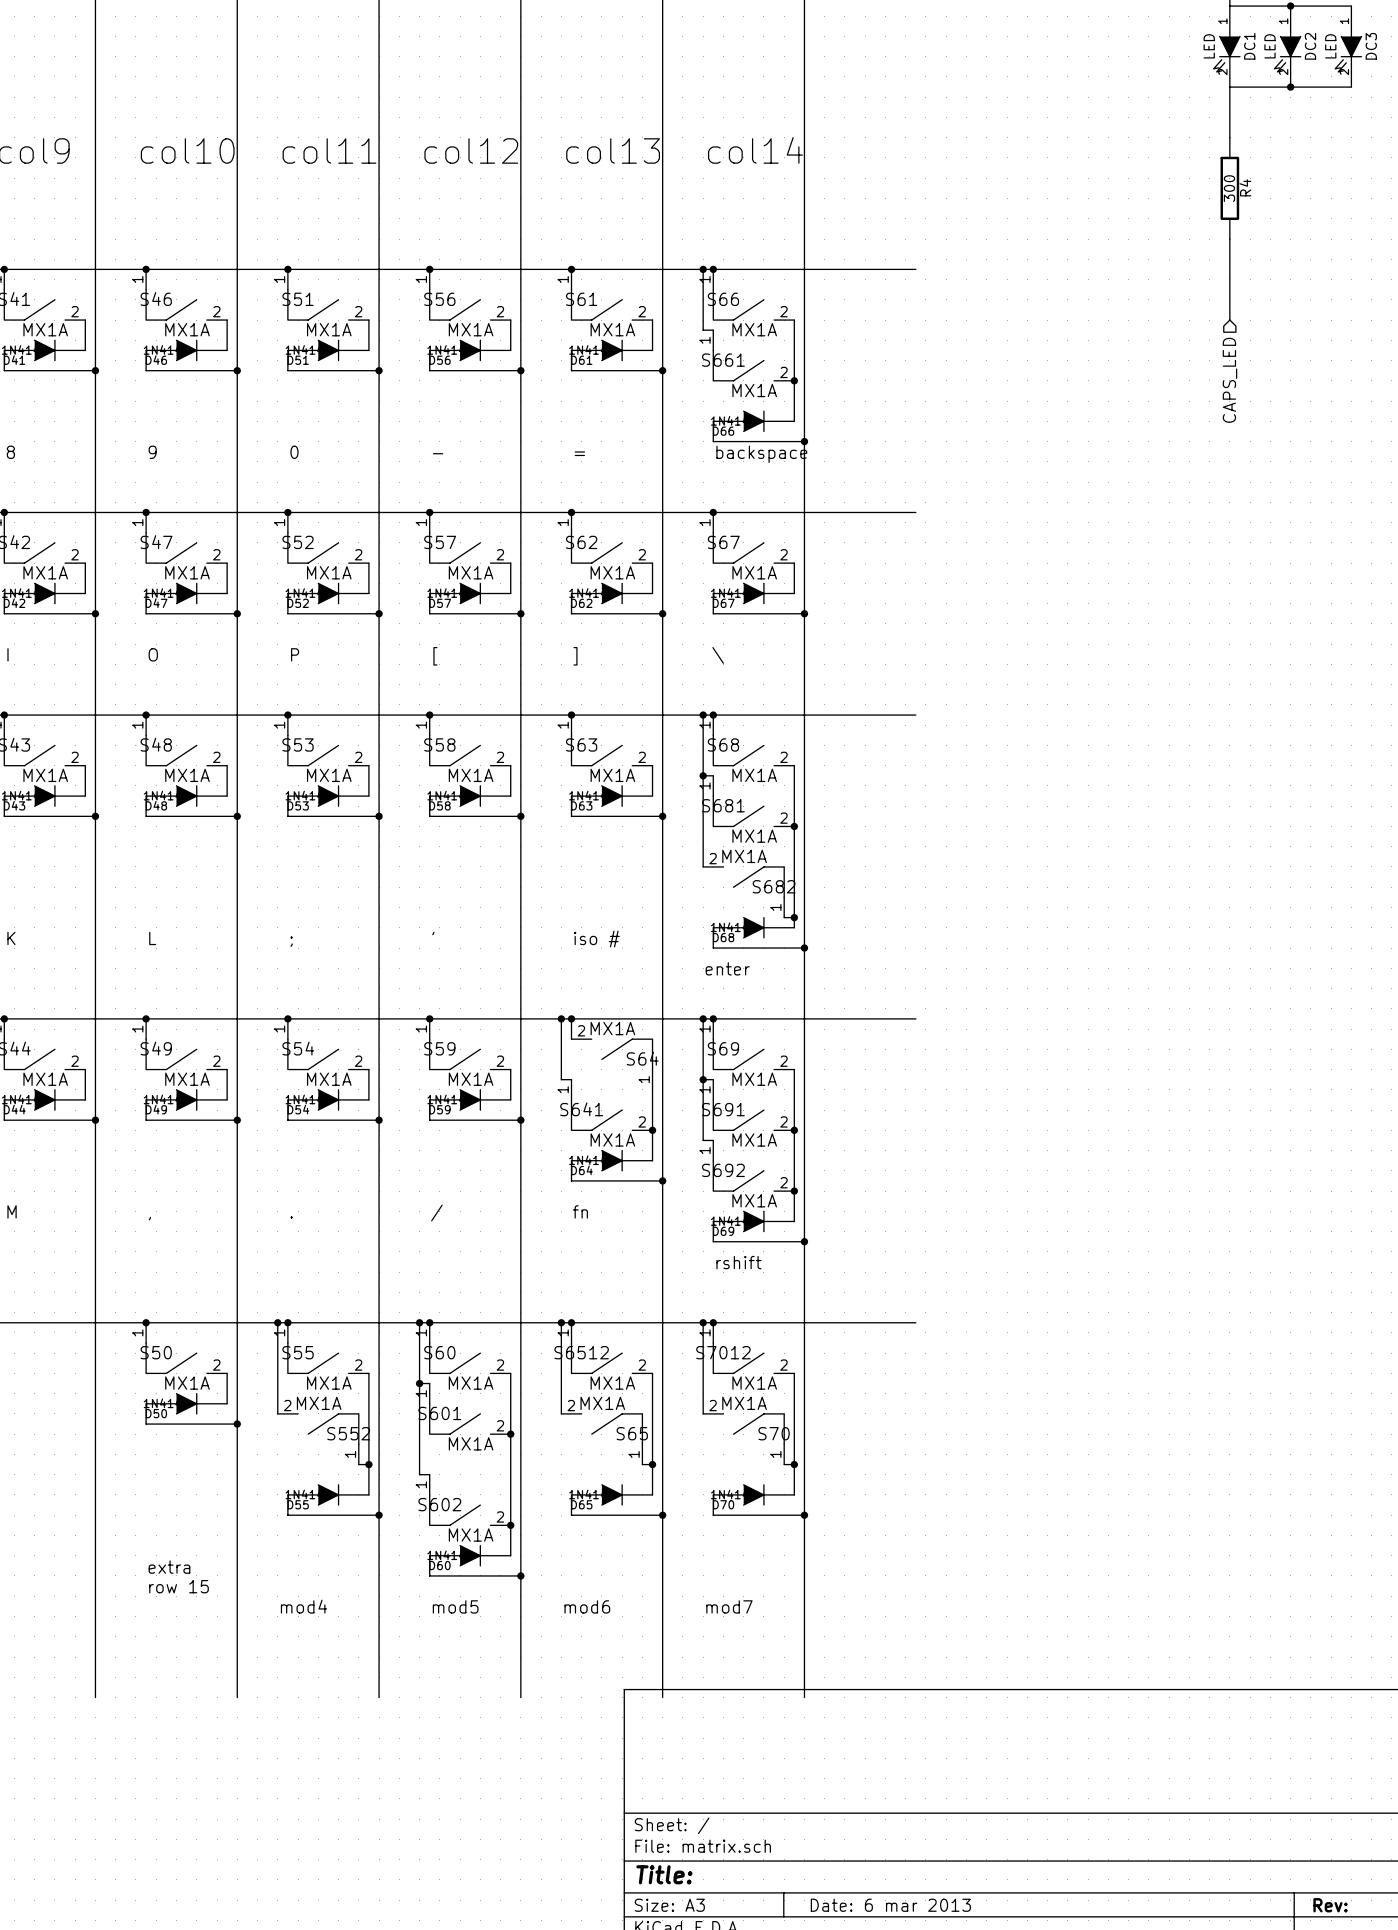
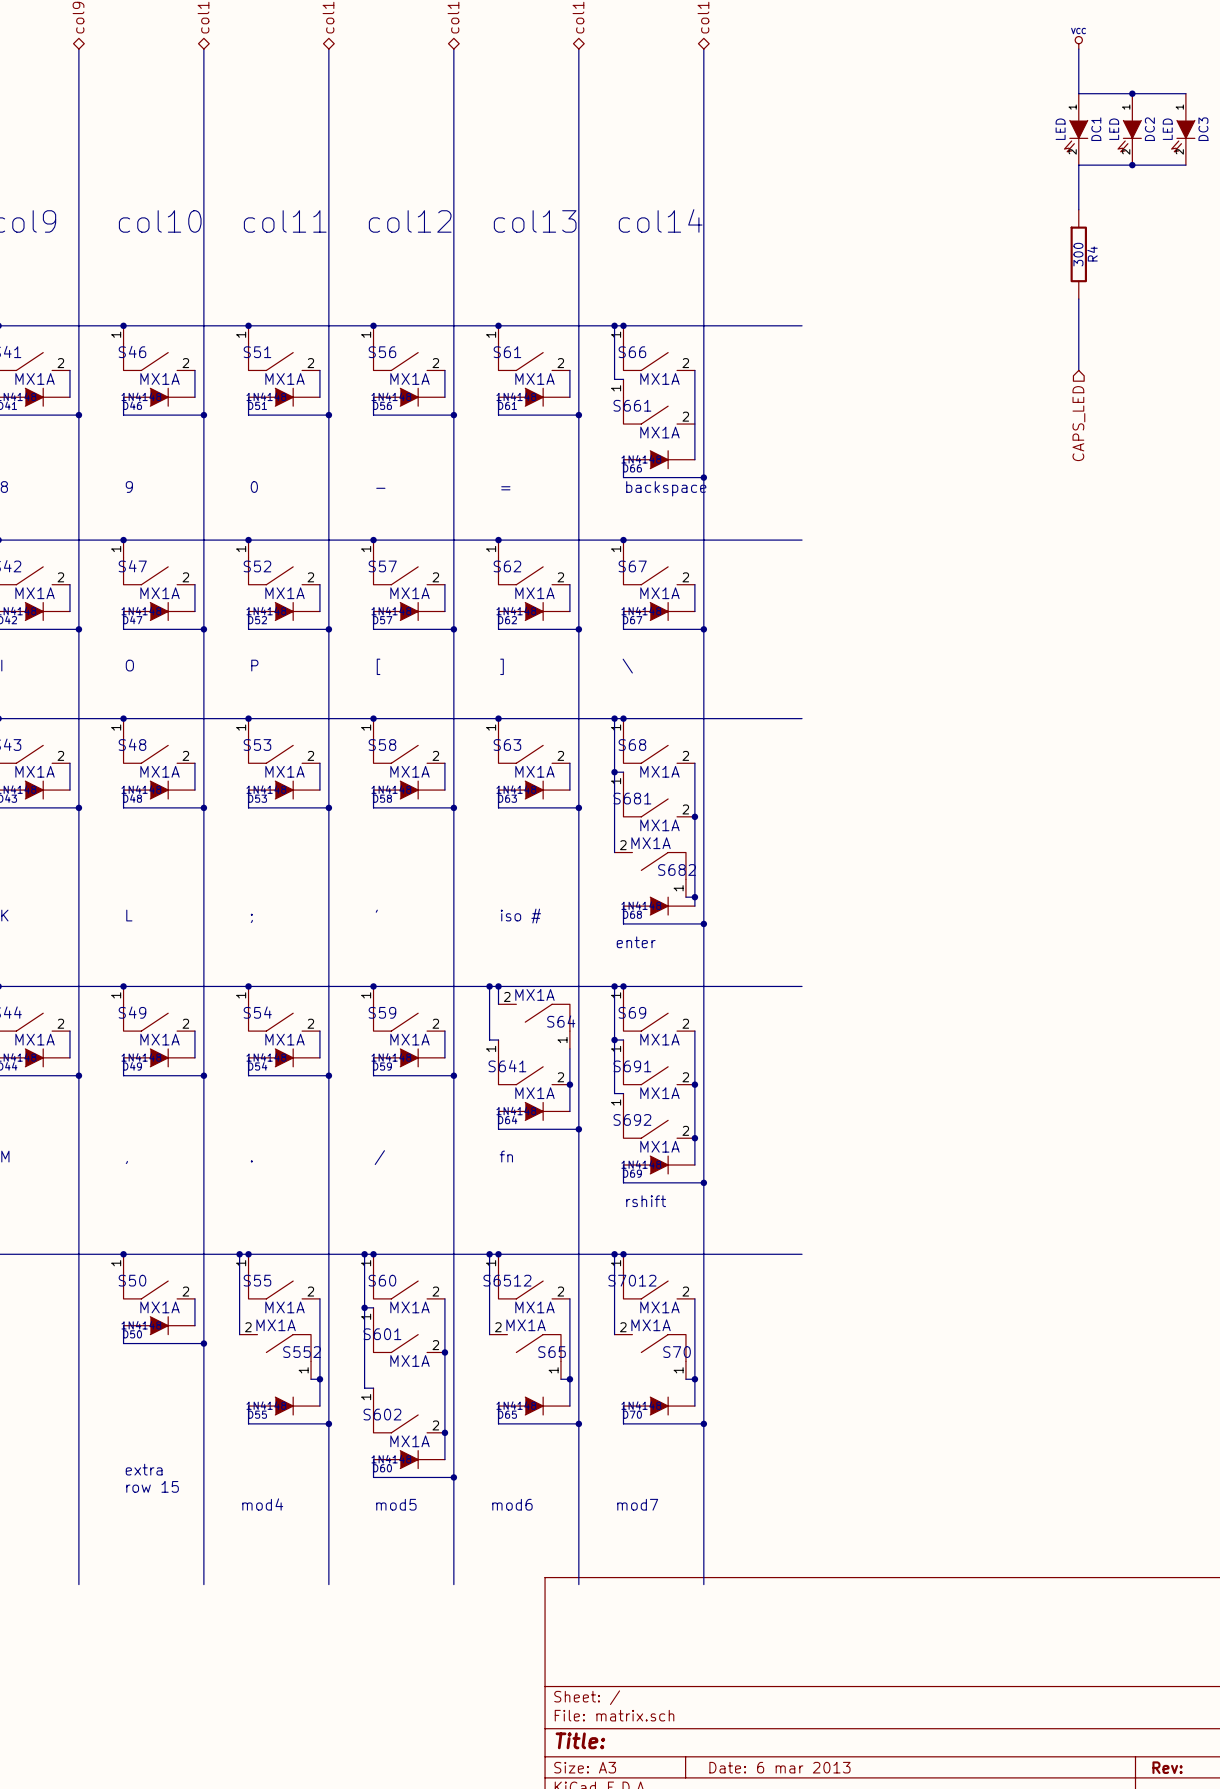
junction: (794, 380) -> none

